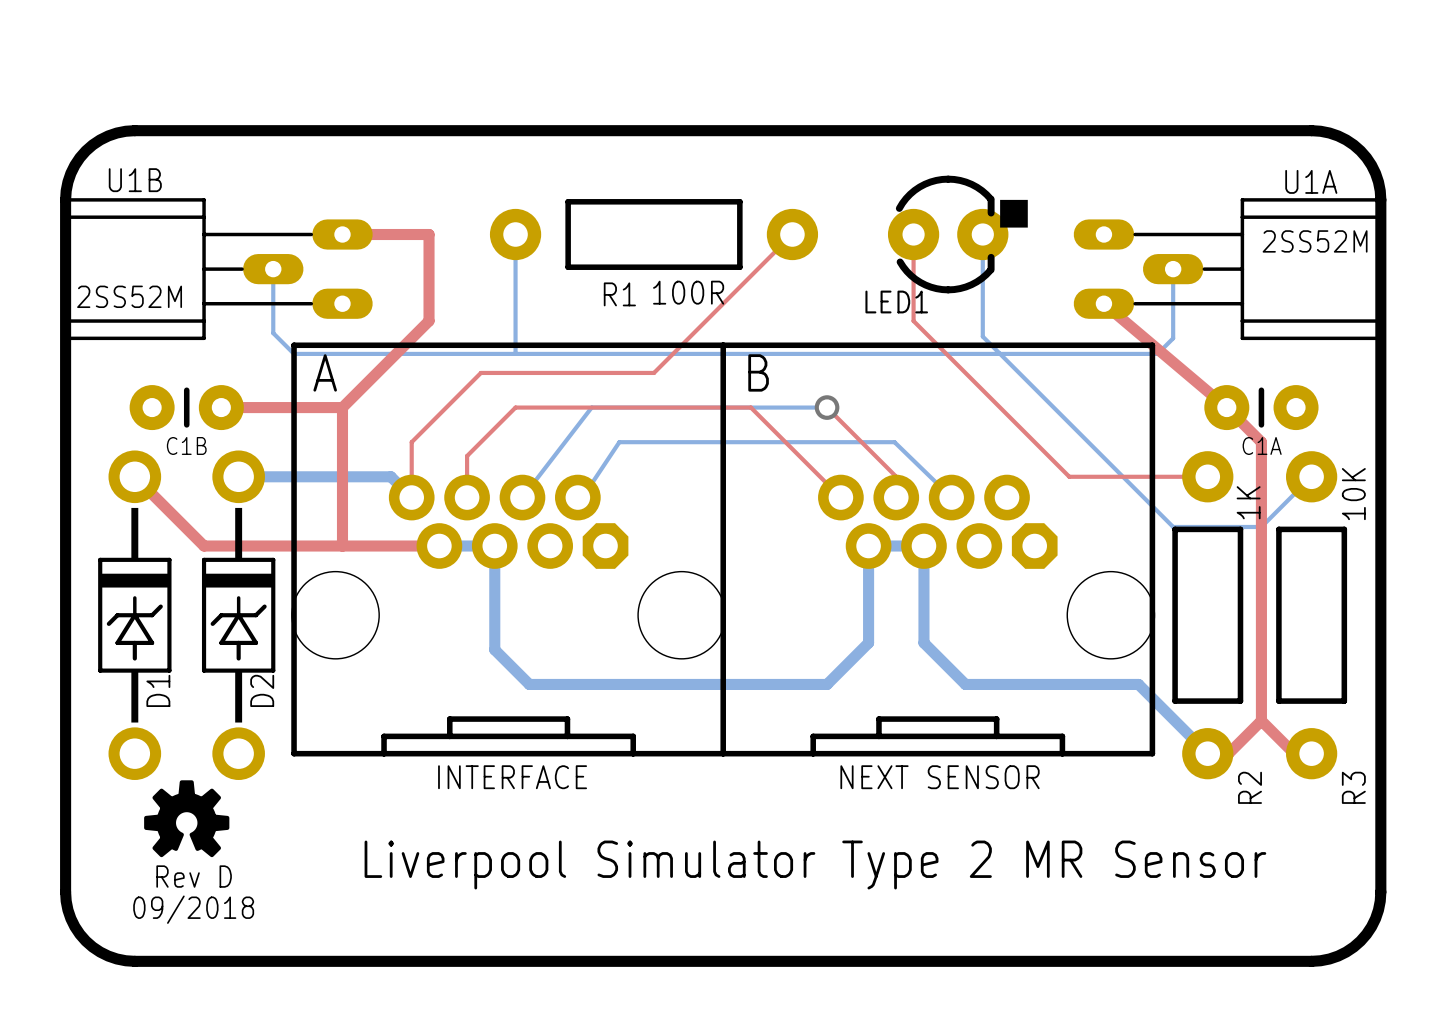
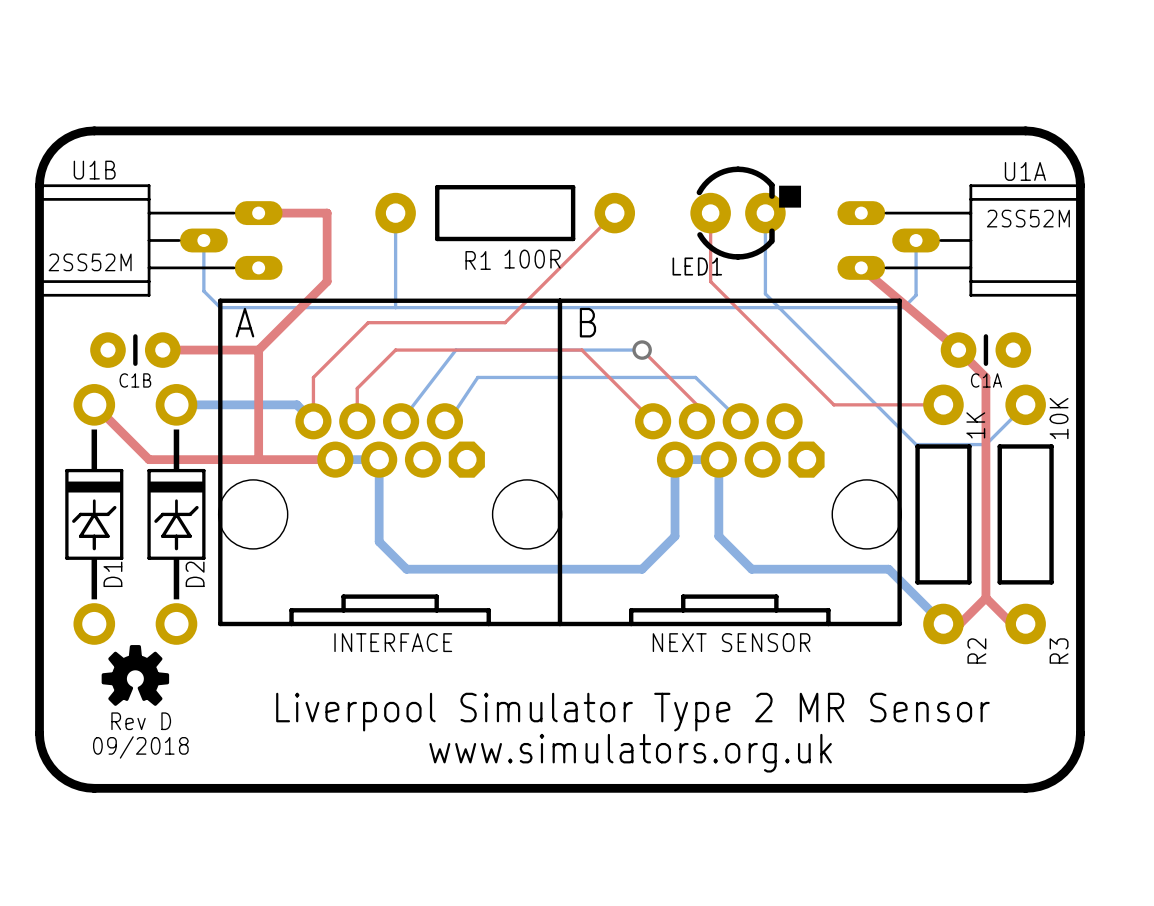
text: none -> www.simulators.org.uk (630, 753)

